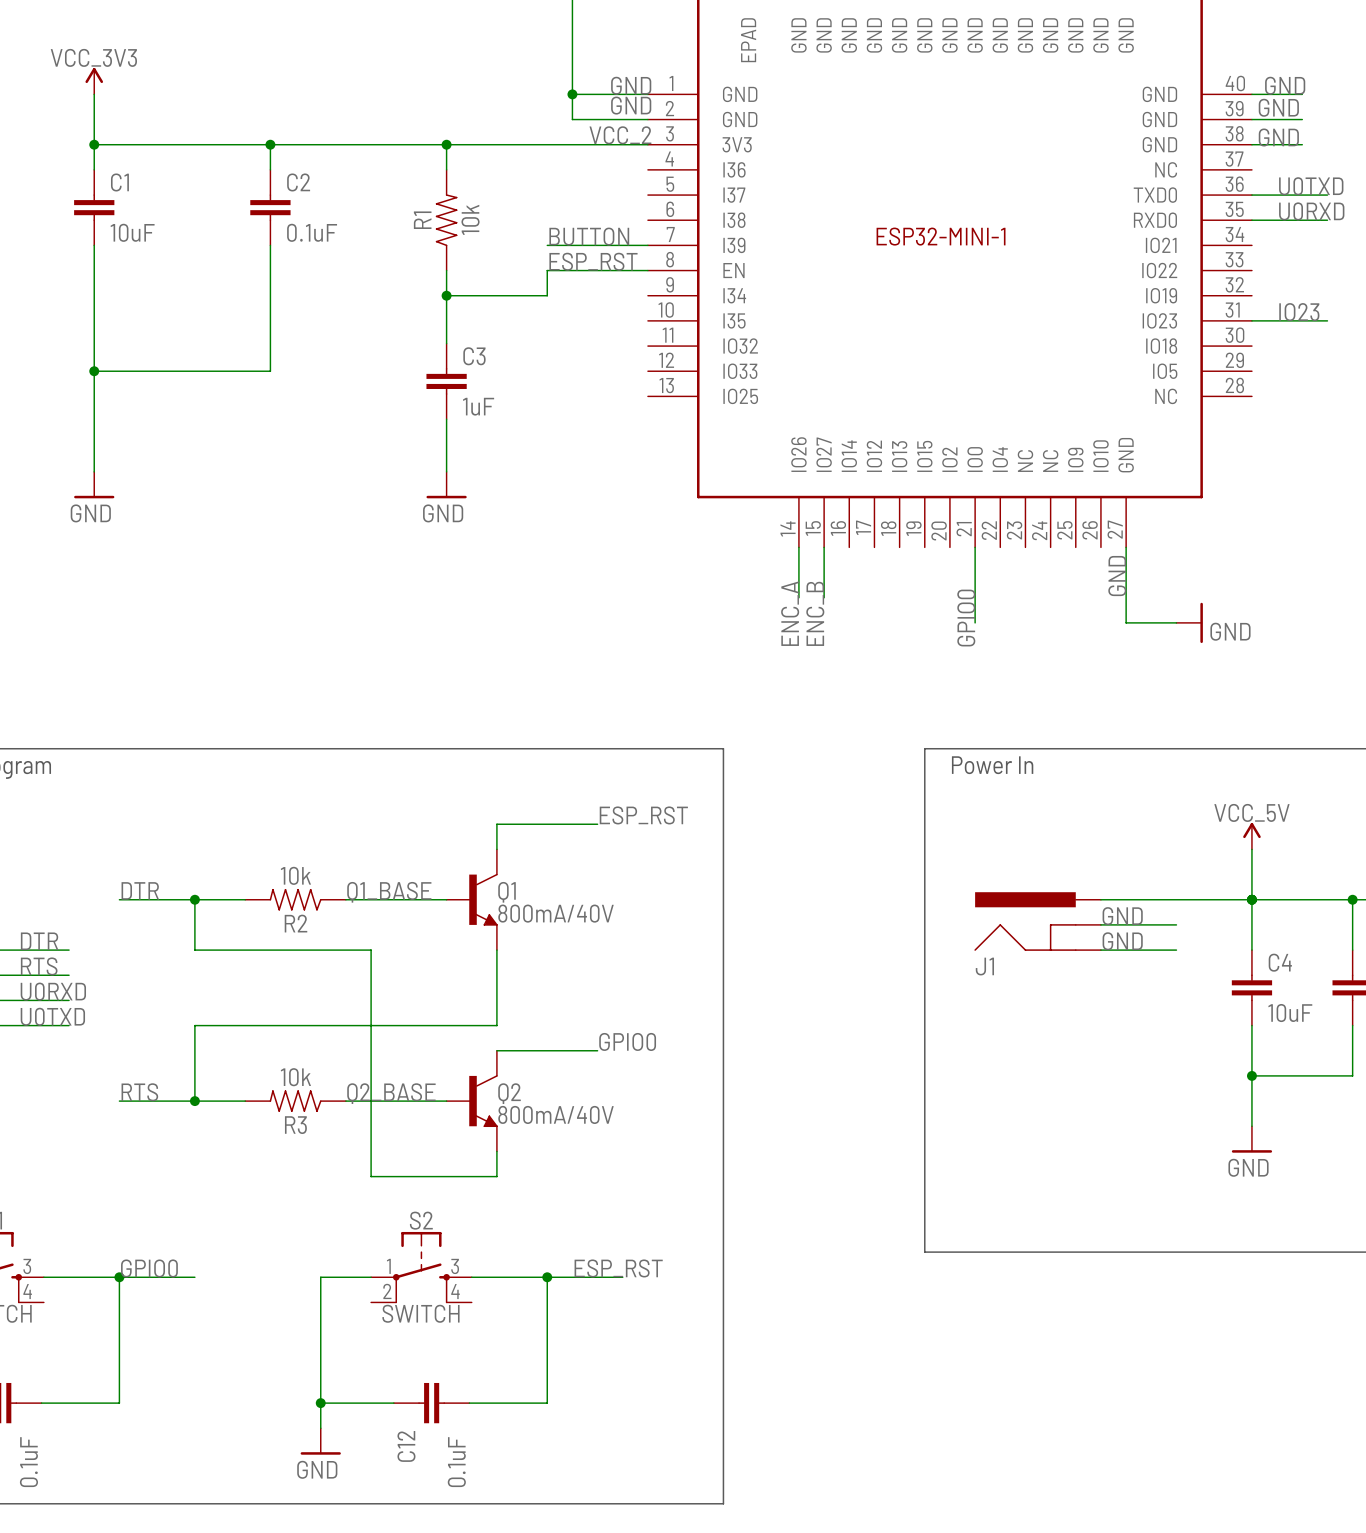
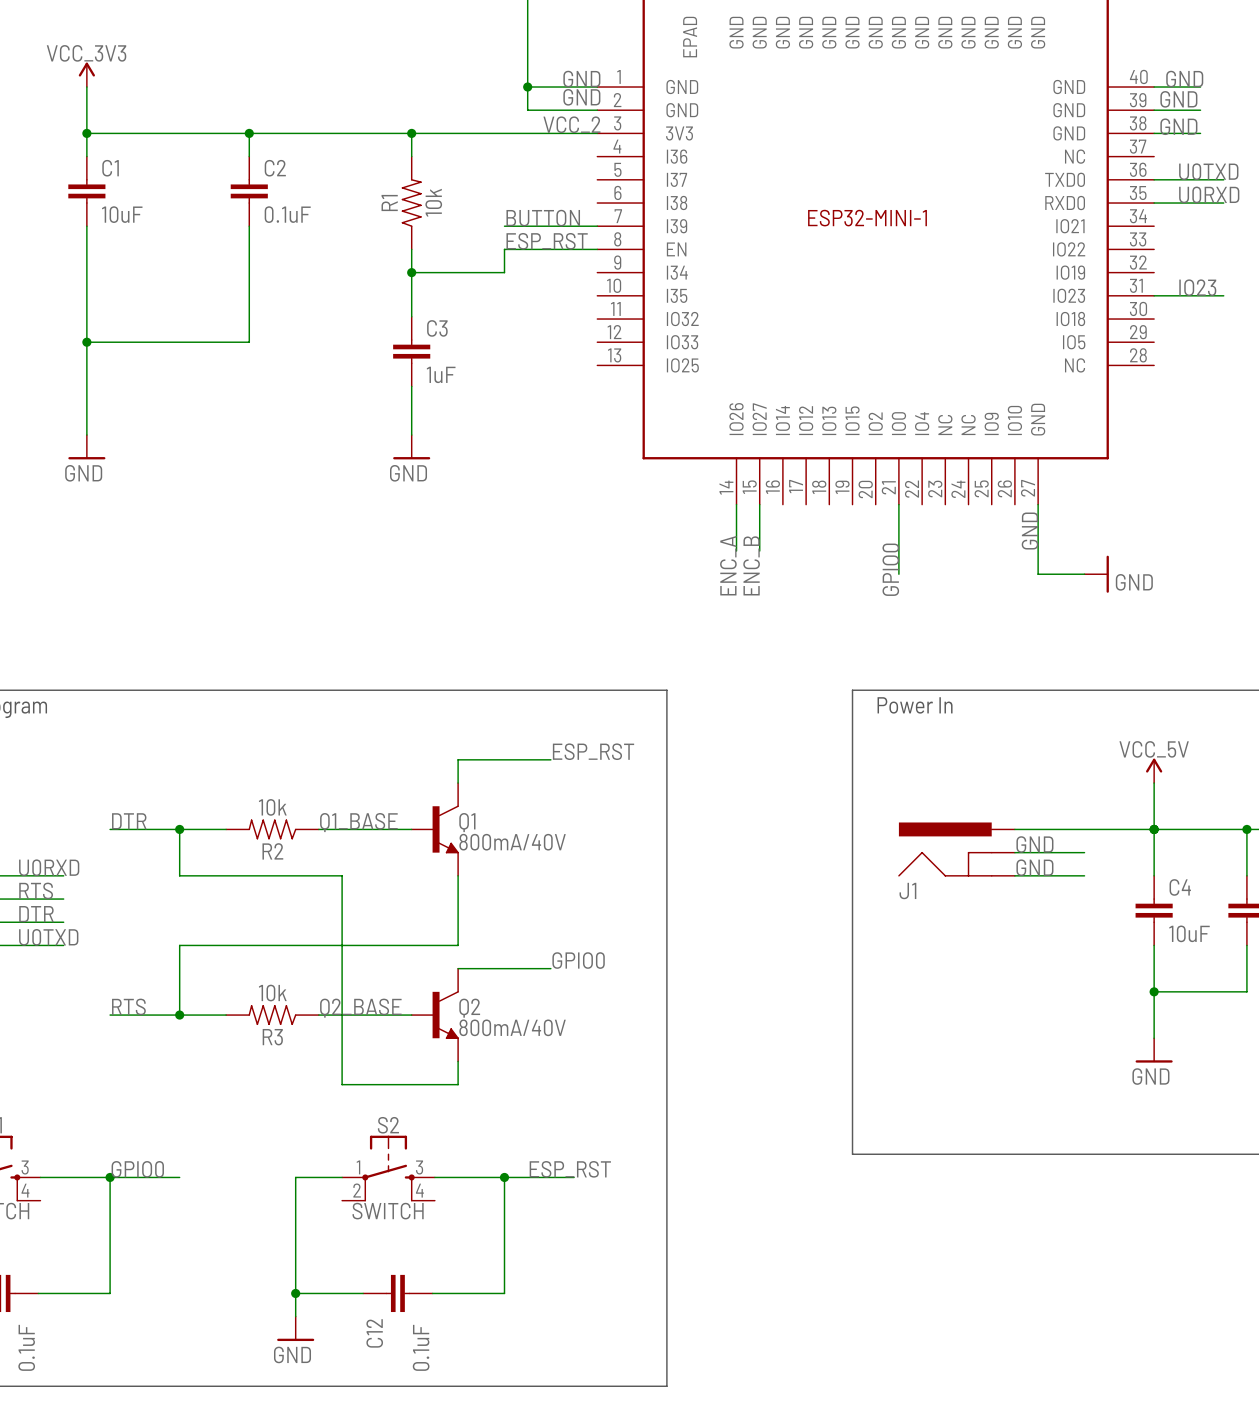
label: DTR (39, 941) -> U0RXD (49, 867)
label: U0RXD (53, 991) -> DTR (36, 914)

